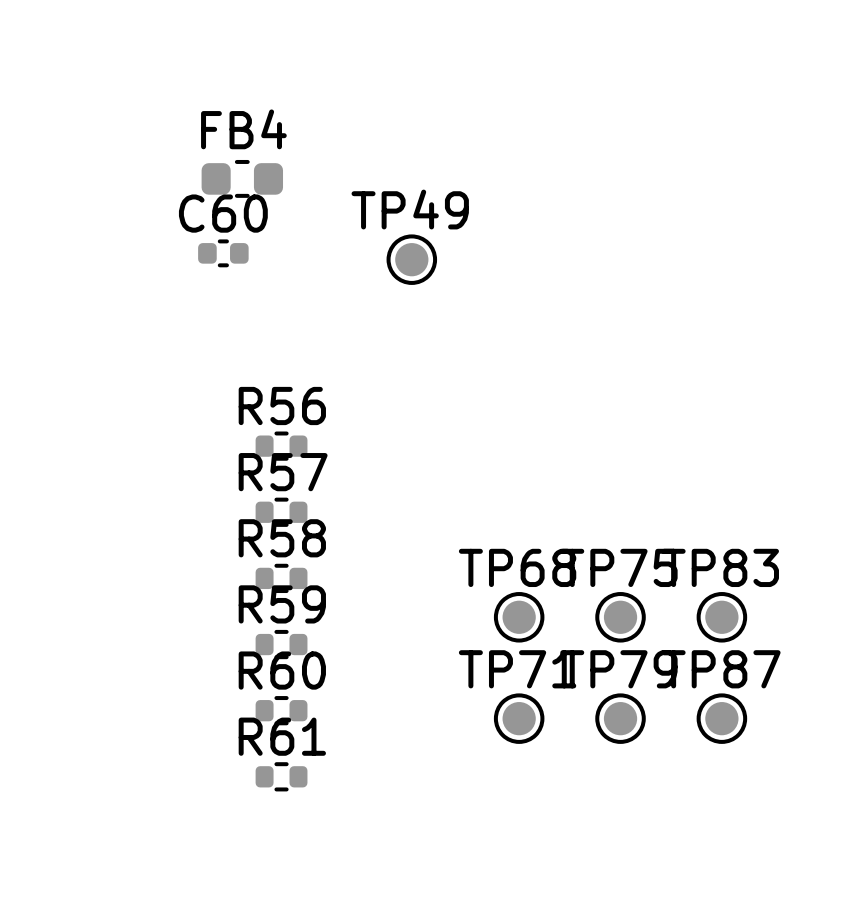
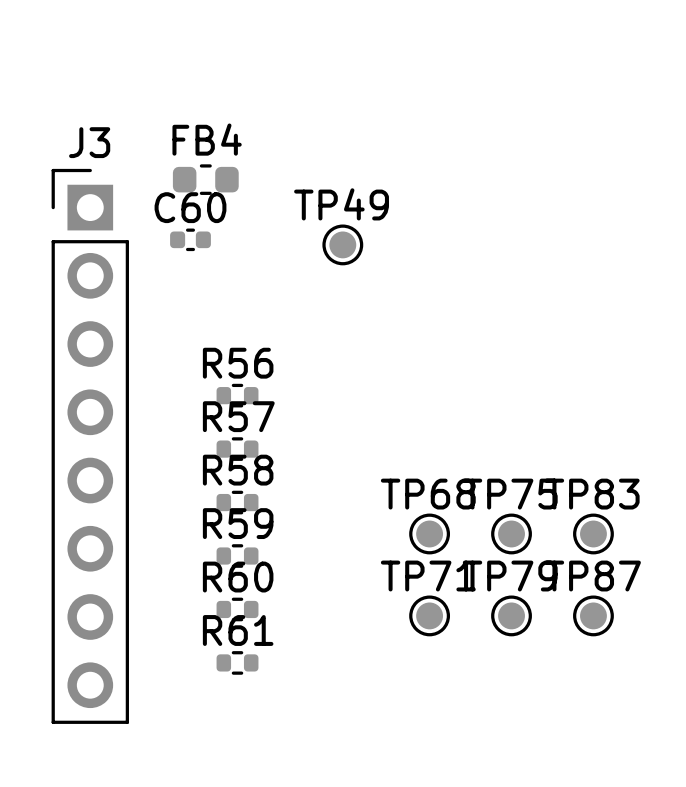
J3: none -> (90, 446)

